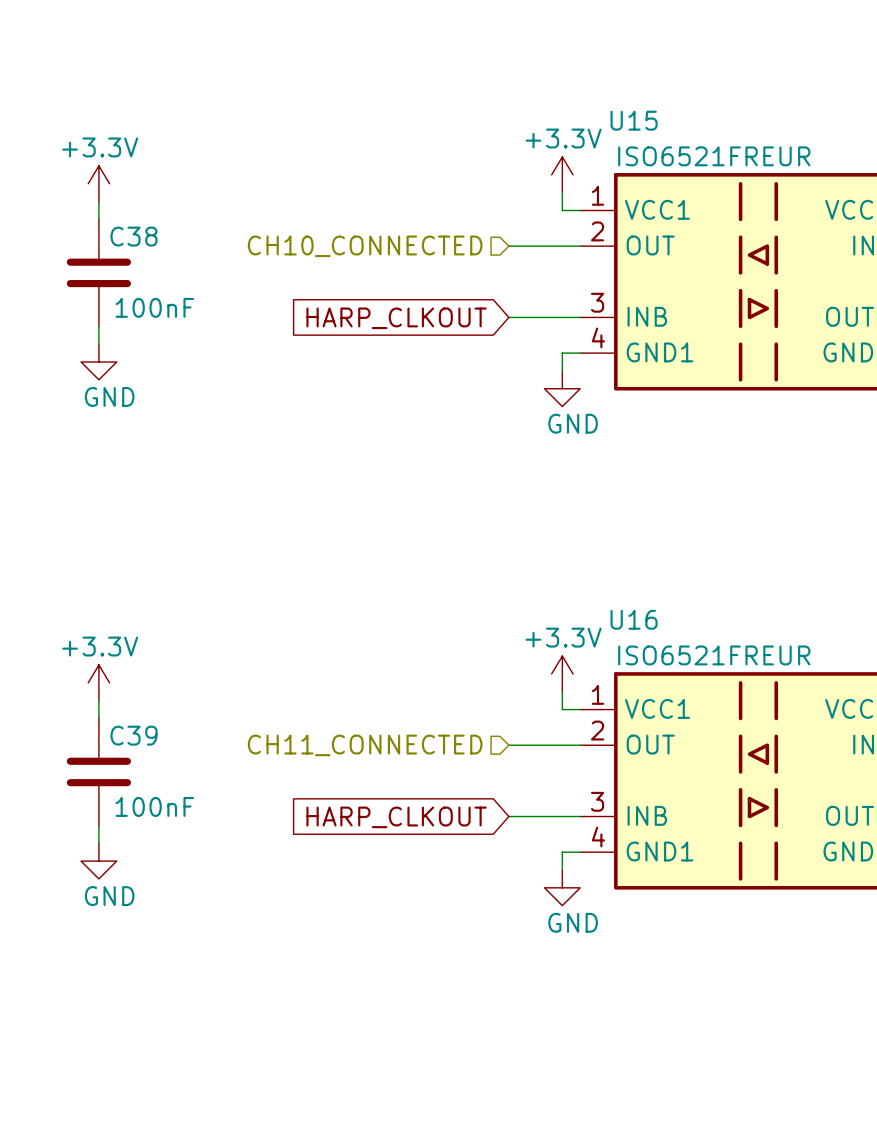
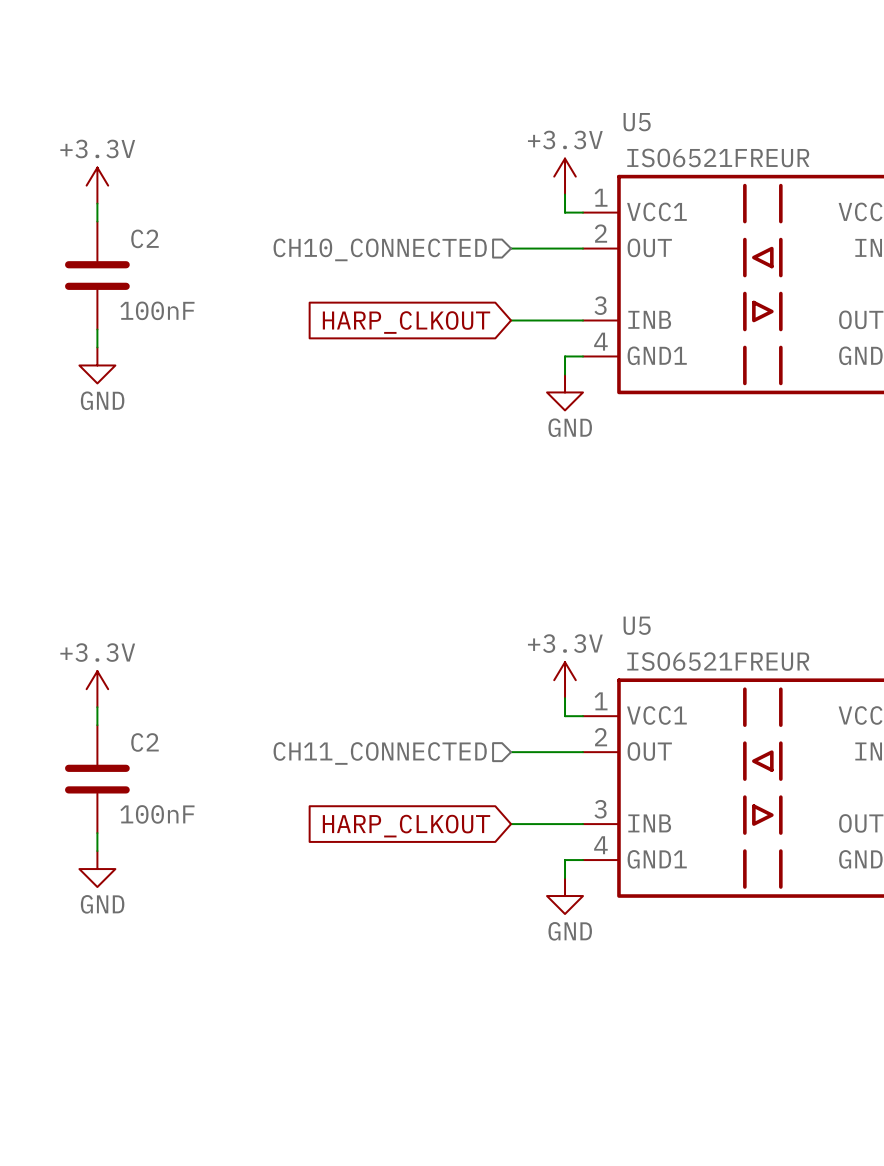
U15 name: U15 (634, 120) -> U5 (637, 122)
C38 name: C38 (134, 236) -> C2 (144, 238)
U16 name: U16 (634, 619) -> U5 (637, 625)
C39 name: C39 (134, 735) -> C2 (144, 742)

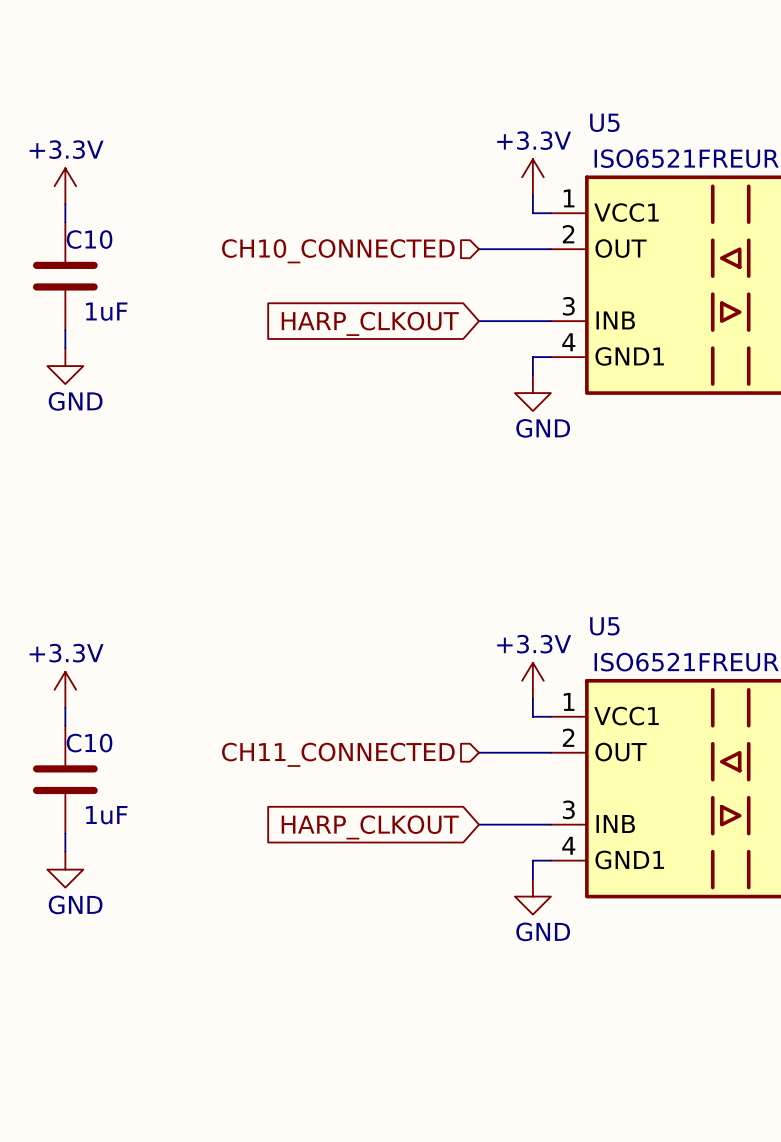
C2 name: C2 (144, 238) -> C10 (89, 239)
C2 value: 100nF (157, 310) -> 1uF (106, 311)
C2 name: C2 (144, 742) -> C10 (89, 743)
C2 value: 100nF (157, 814) -> 1uF (106, 815)

